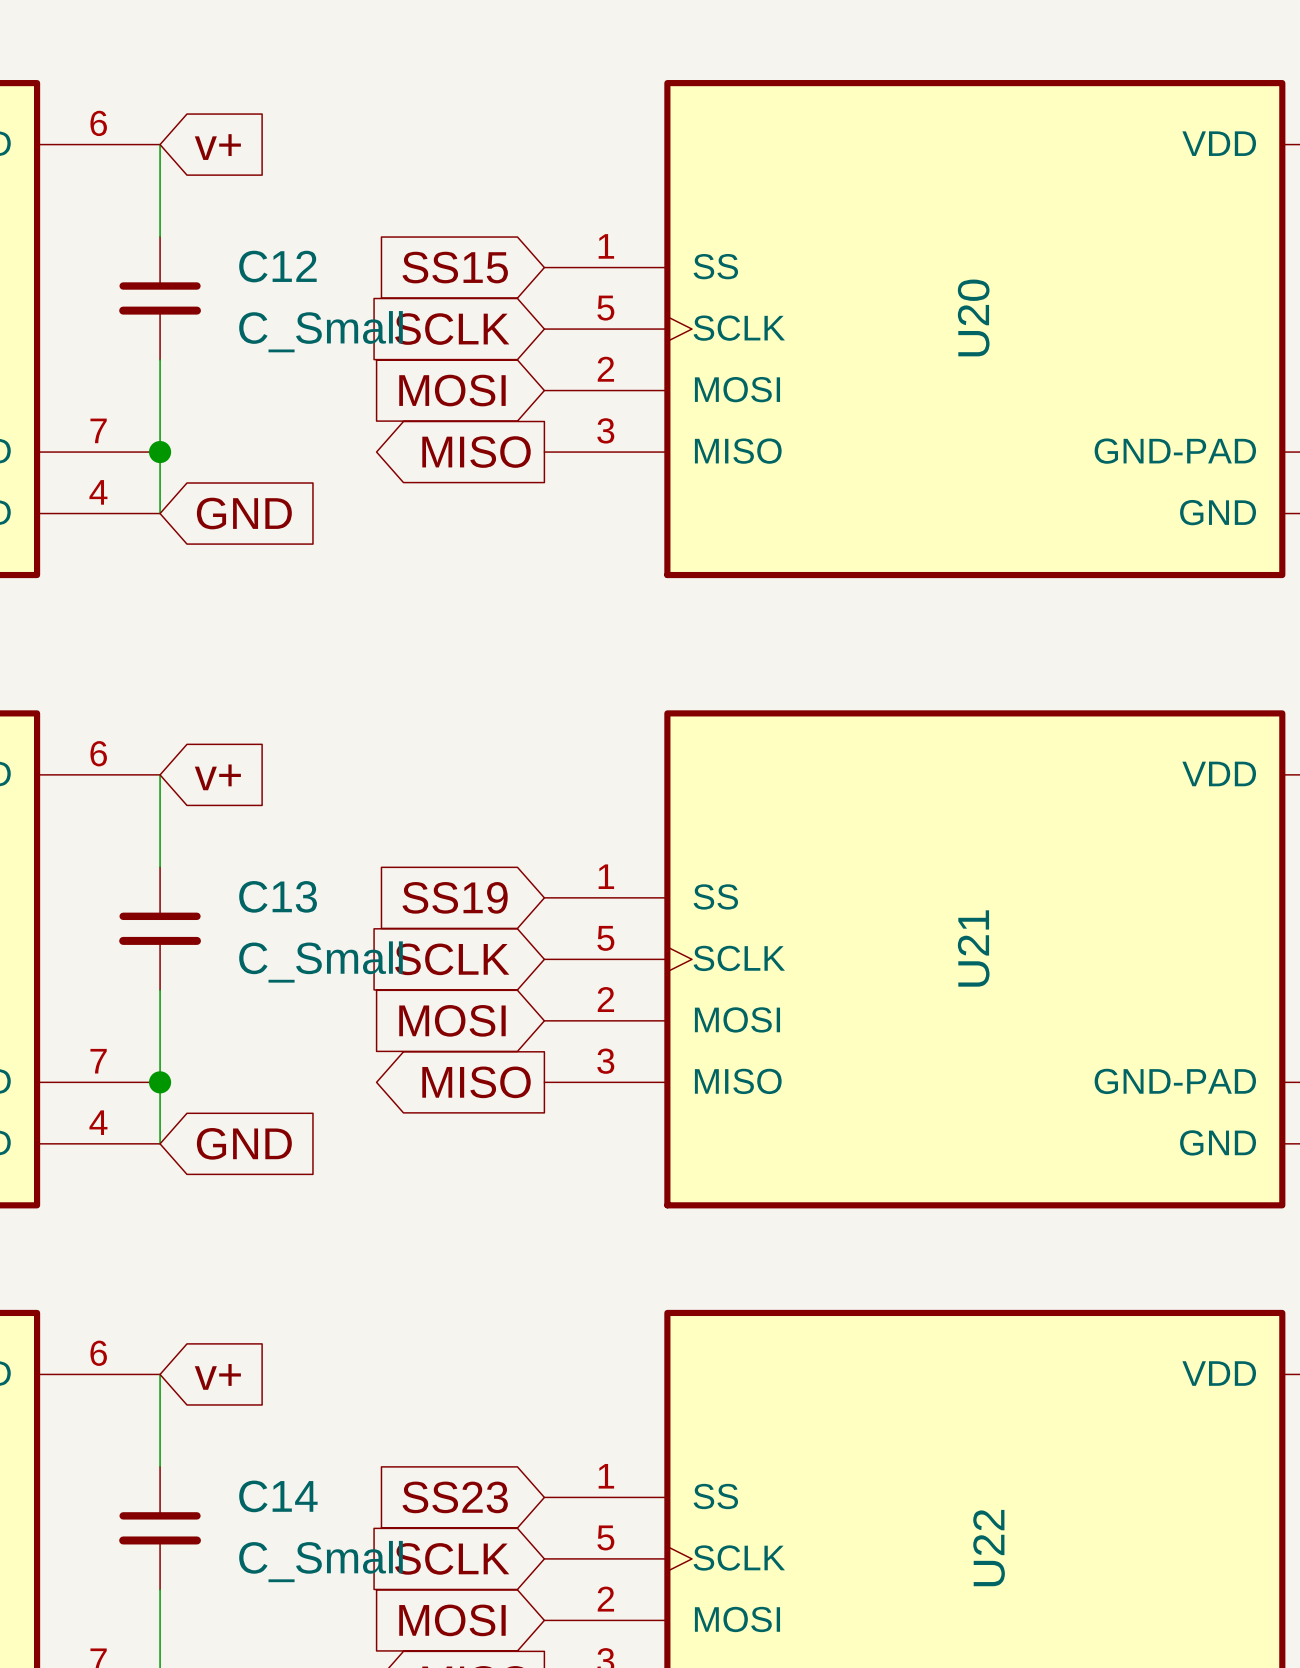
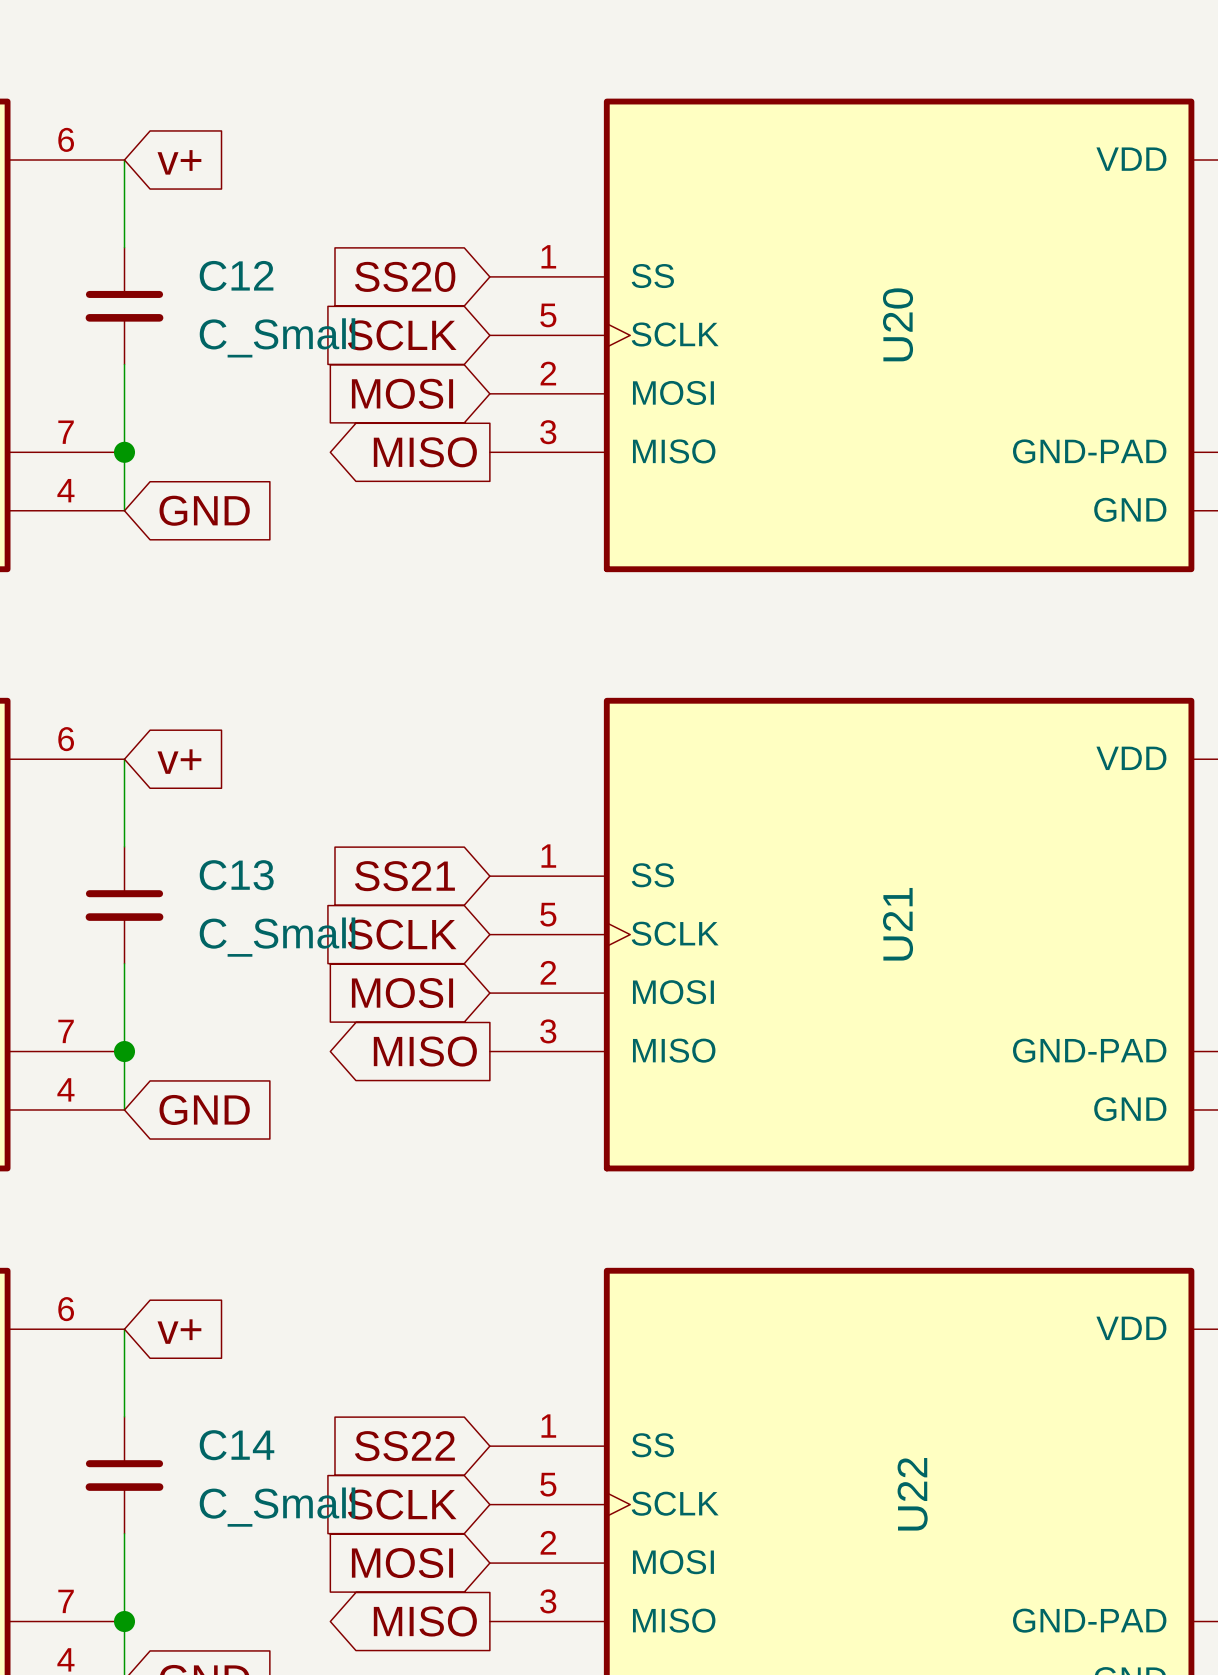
global label: SS15 (455, 267) -> SS20 (405, 276)
global label: SS19 (455, 897) -> SS21 (404, 876)
global label: SS23 (455, 1497) -> SS22 (404, 1446)

